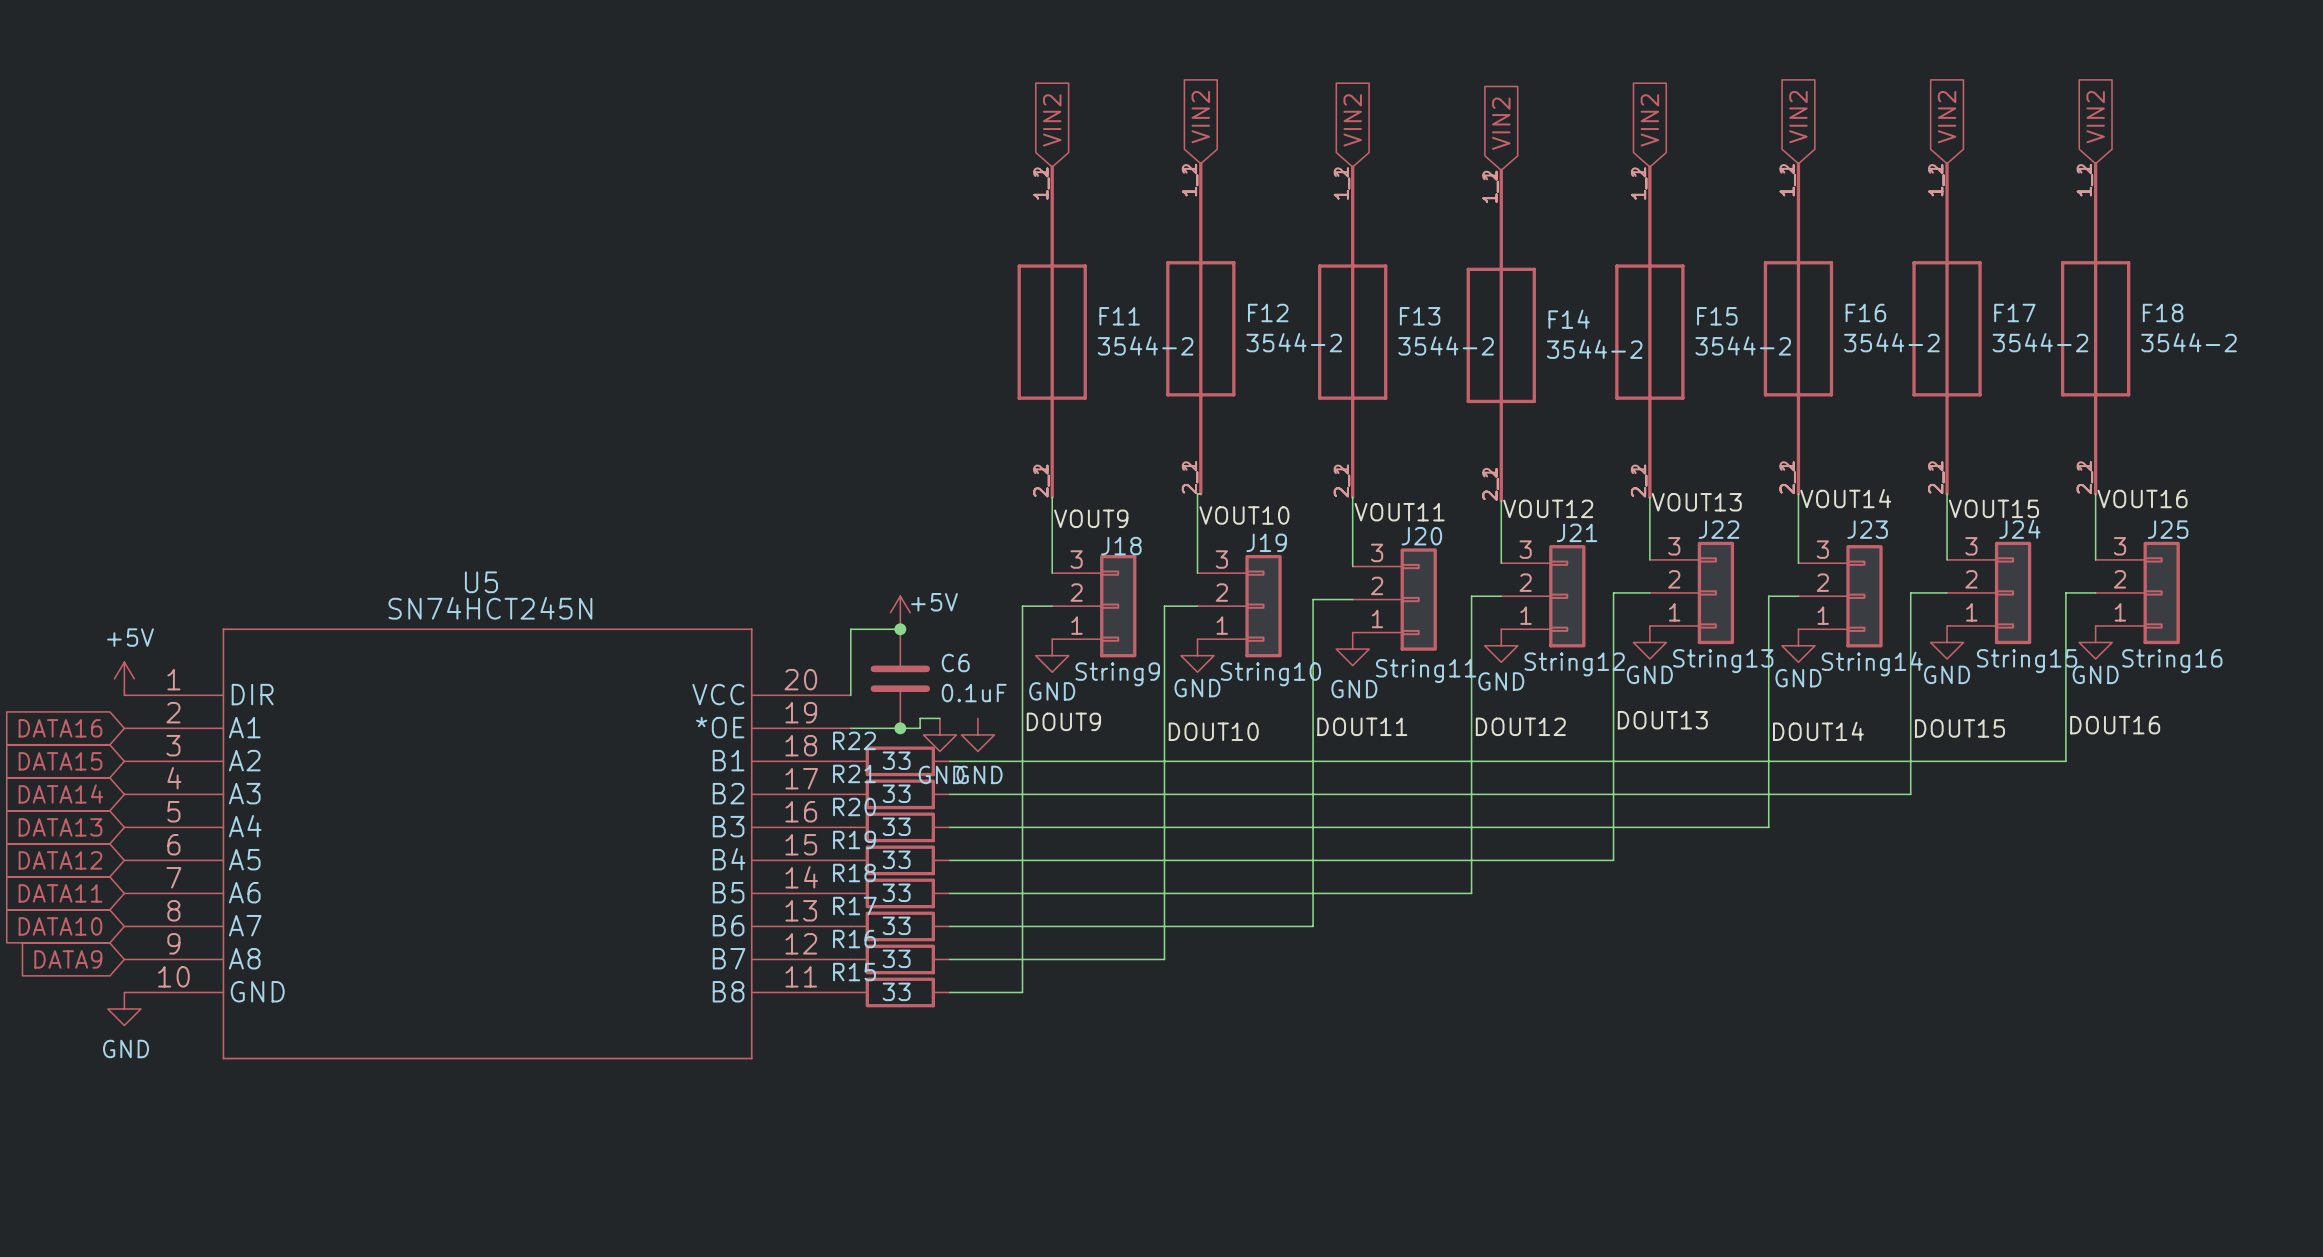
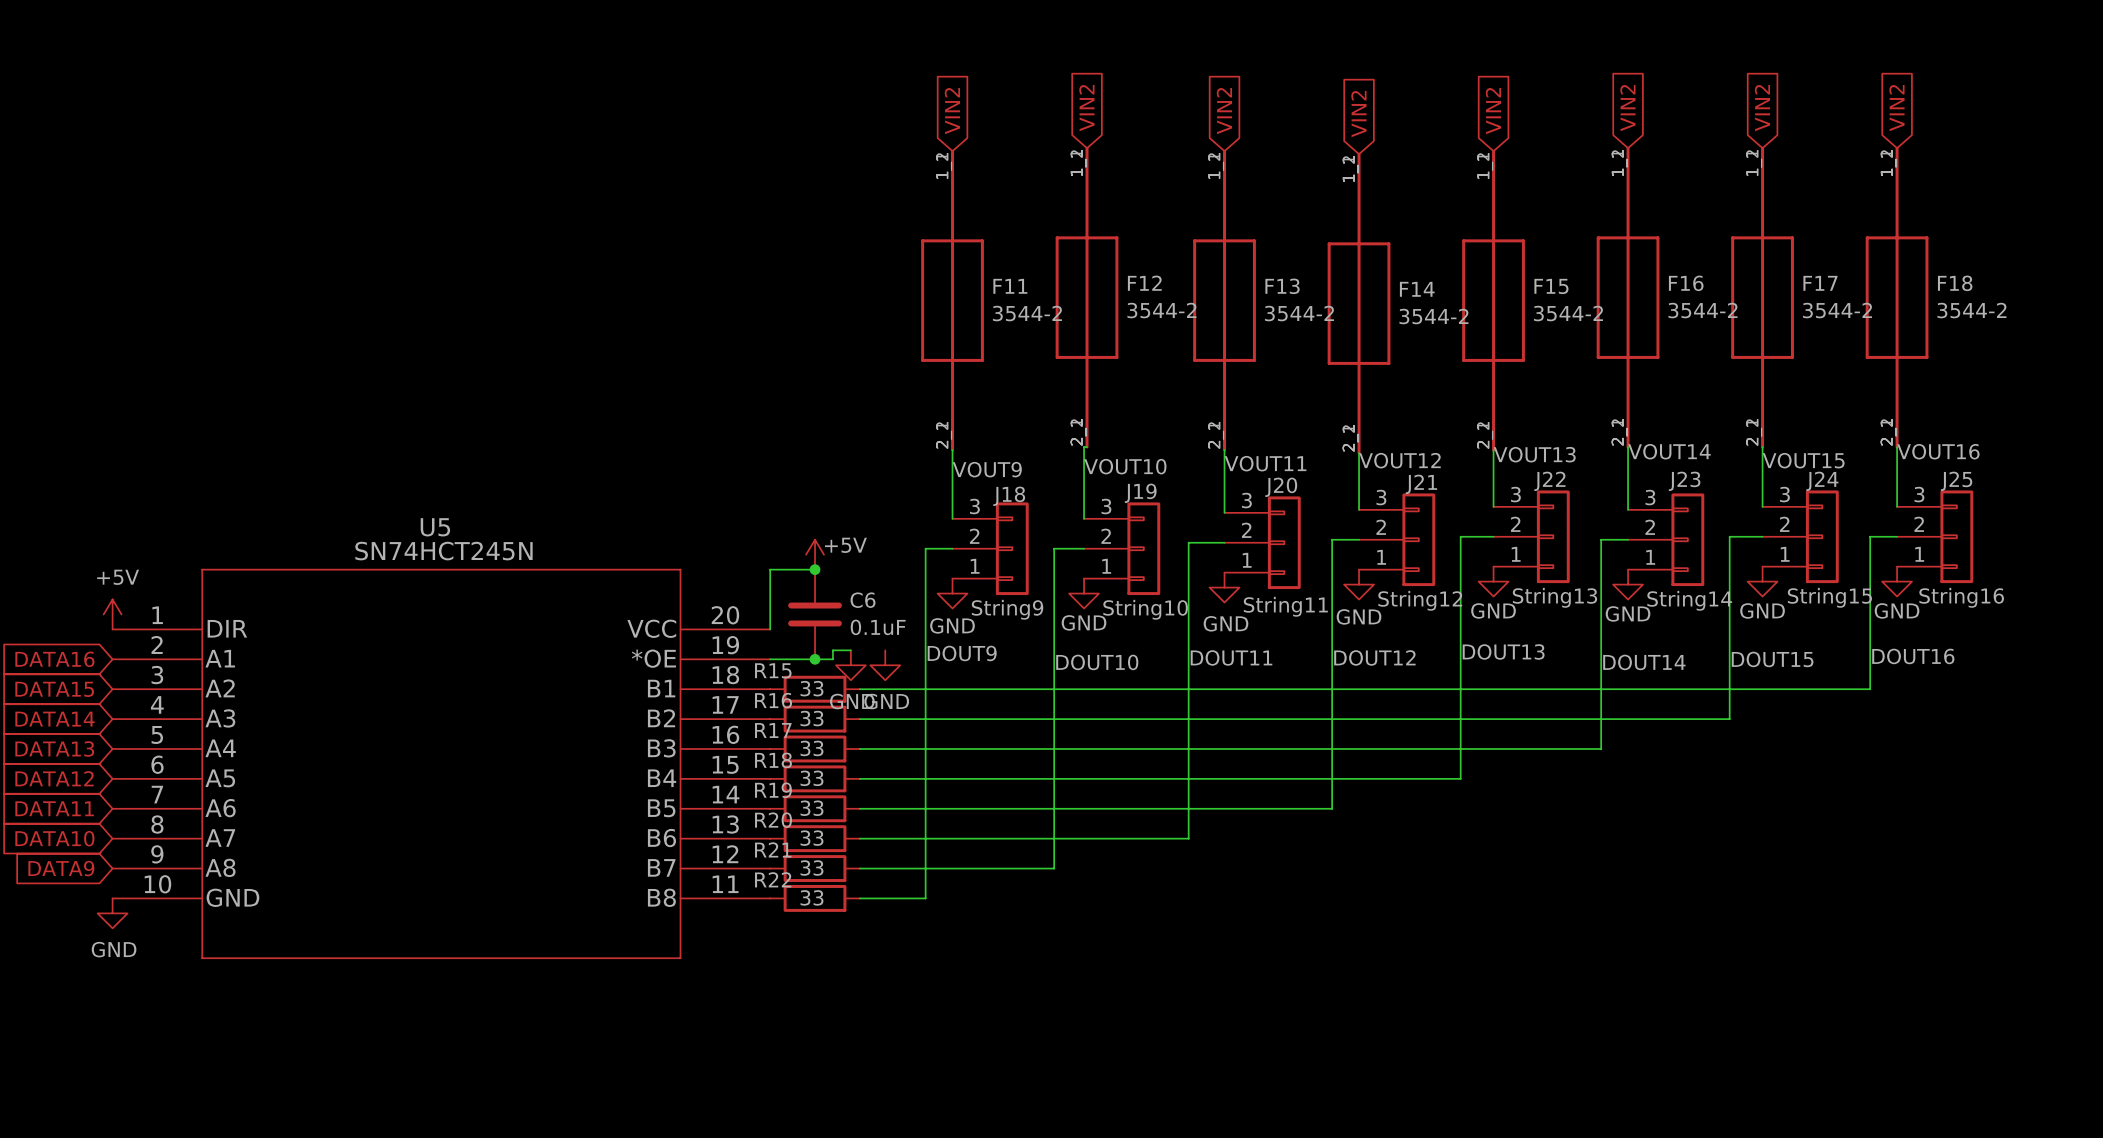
R22 name: R22 (854, 740) -> R15 (773, 670)
R21 name: R21 (854, 773) -> R16 (773, 700)
R20 name: R20 (854, 806) -> R17 (773, 730)
R19 name: R19 (854, 839) -> R18 (773, 760)
R18 name: R18 (854, 872) -> R19 (773, 790)
R17 name: R17 (854, 906) -> R20 (773, 820)
R16 name: R16 (854, 939) -> R21 (773, 849)
R15 name: R15 (854, 972) -> R22 (773, 879)

